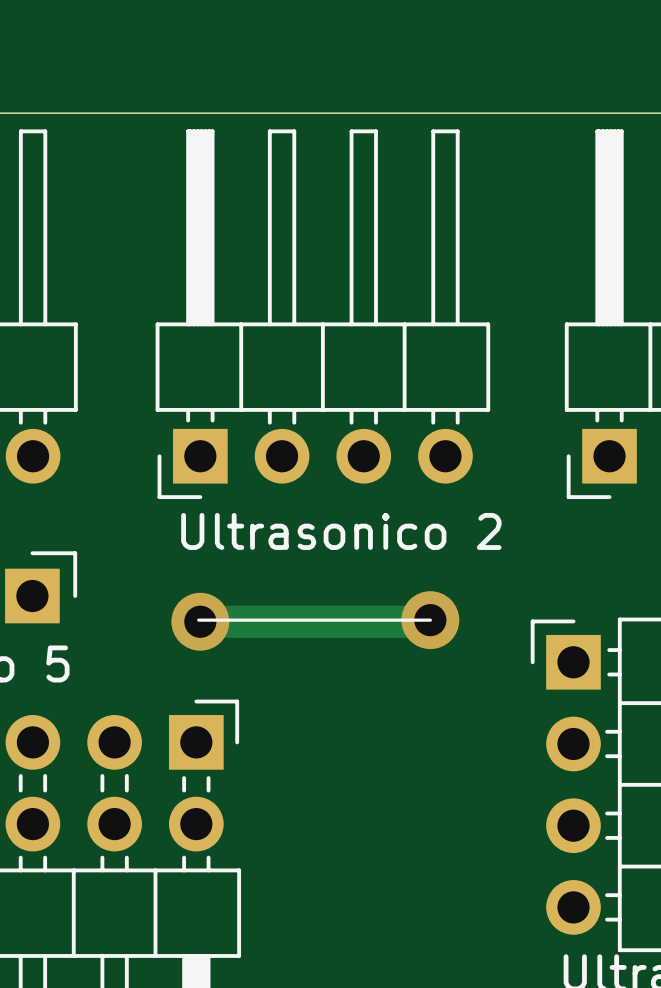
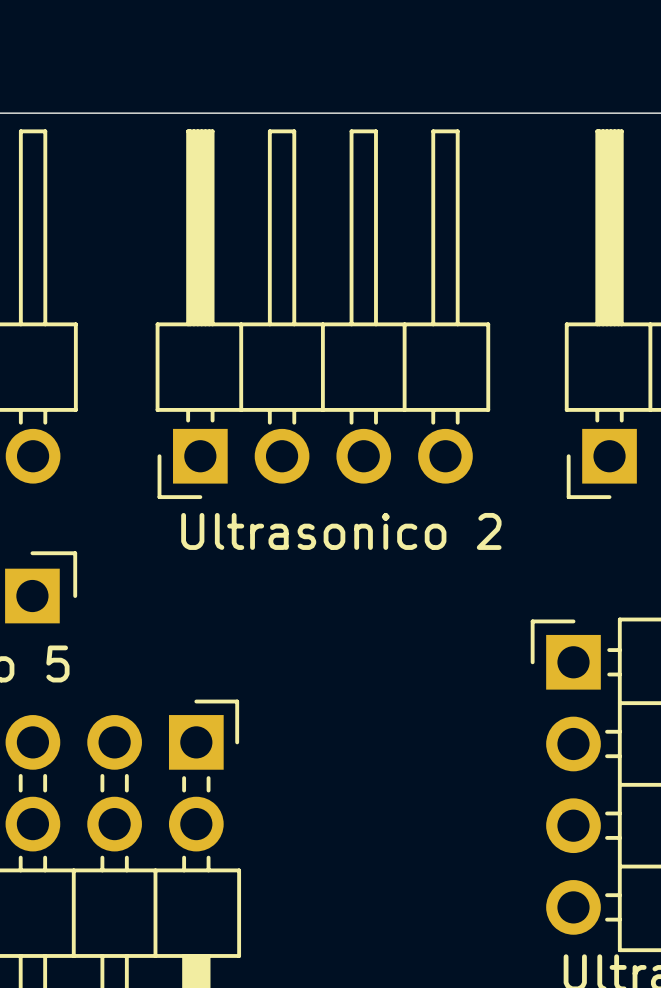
line: (198, 620) (430, 620) -> none
track: (430, 620) (428, 621) (200, 621) -> none
via: (430, 620) -> none
via: (200, 621) -> none

